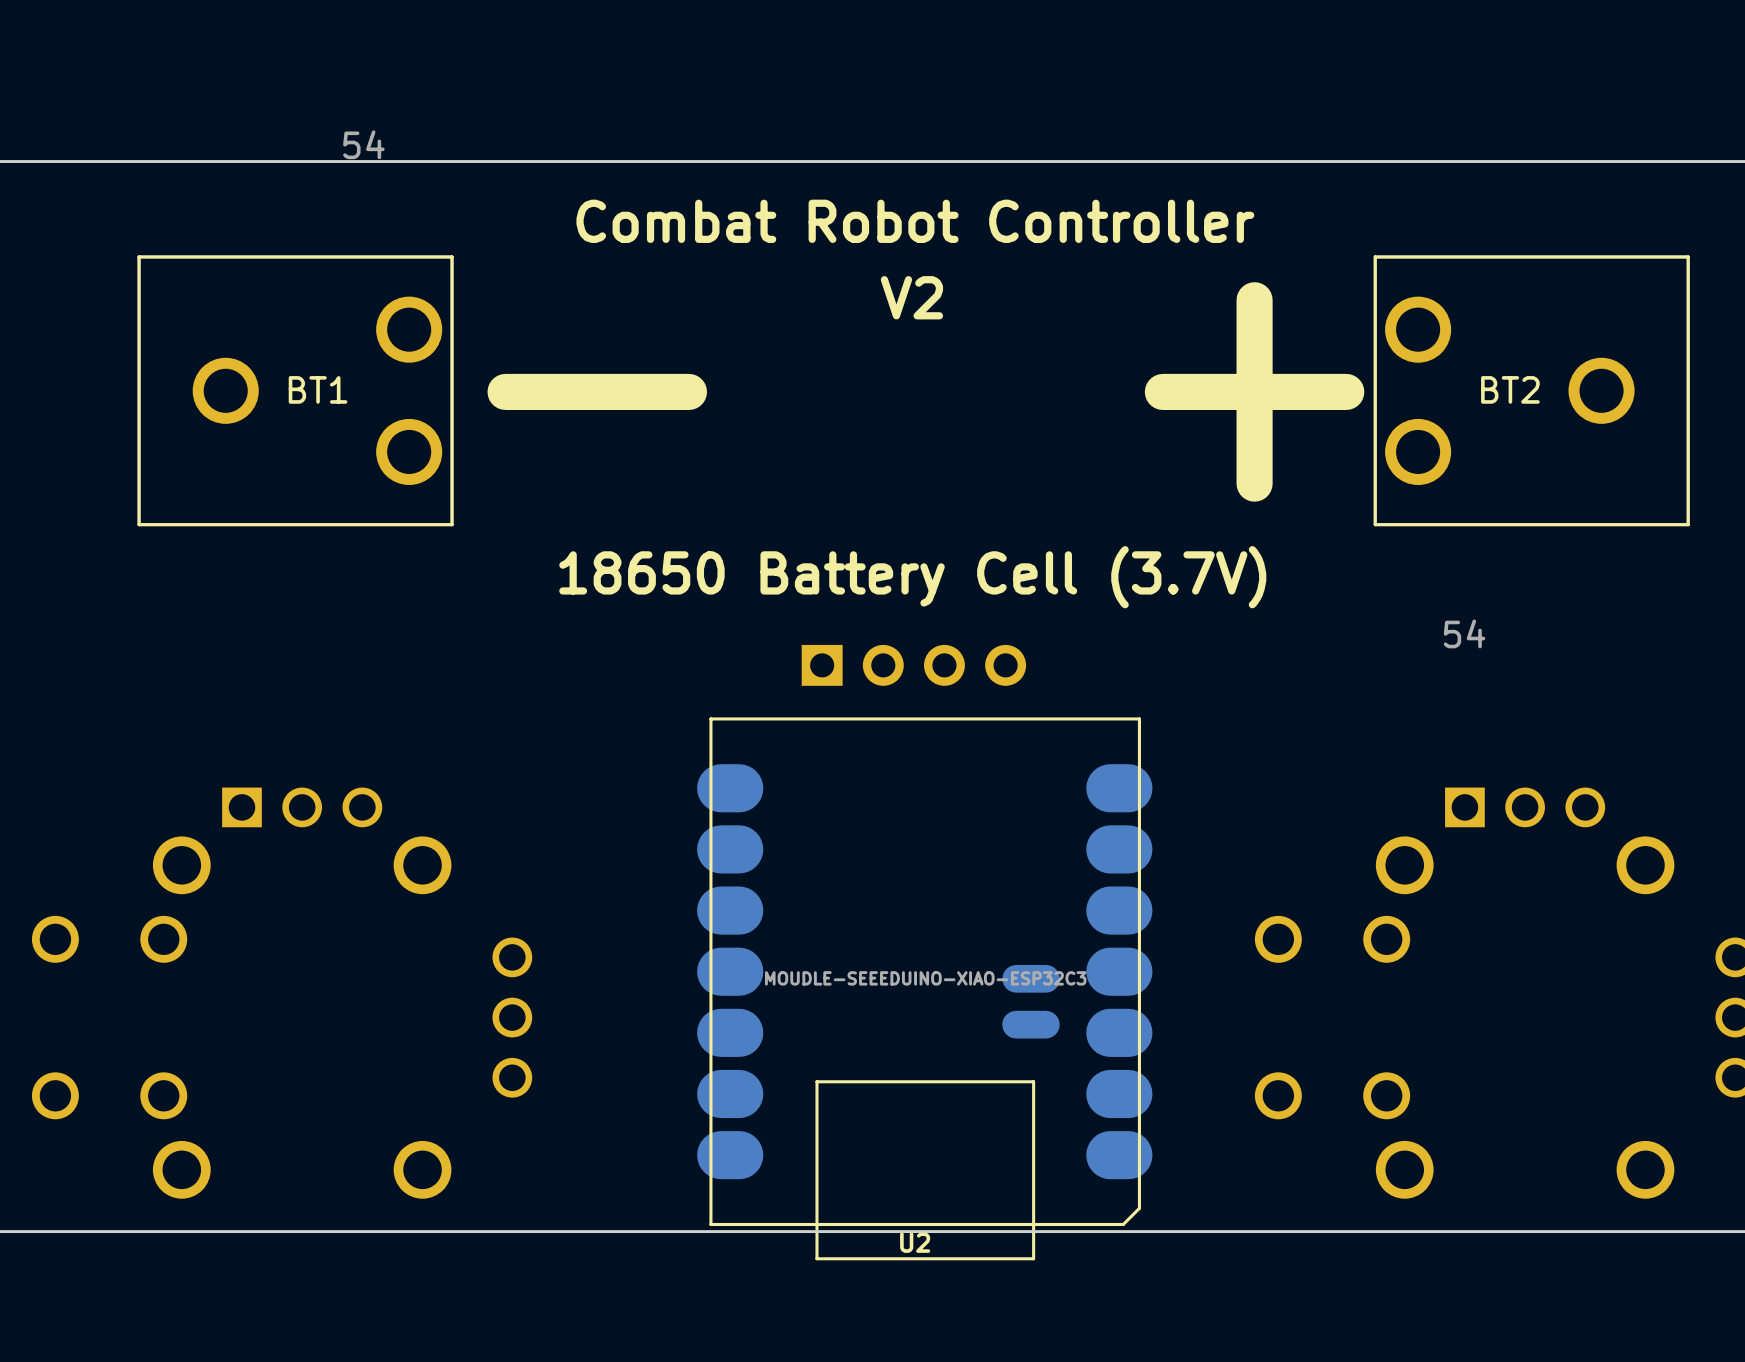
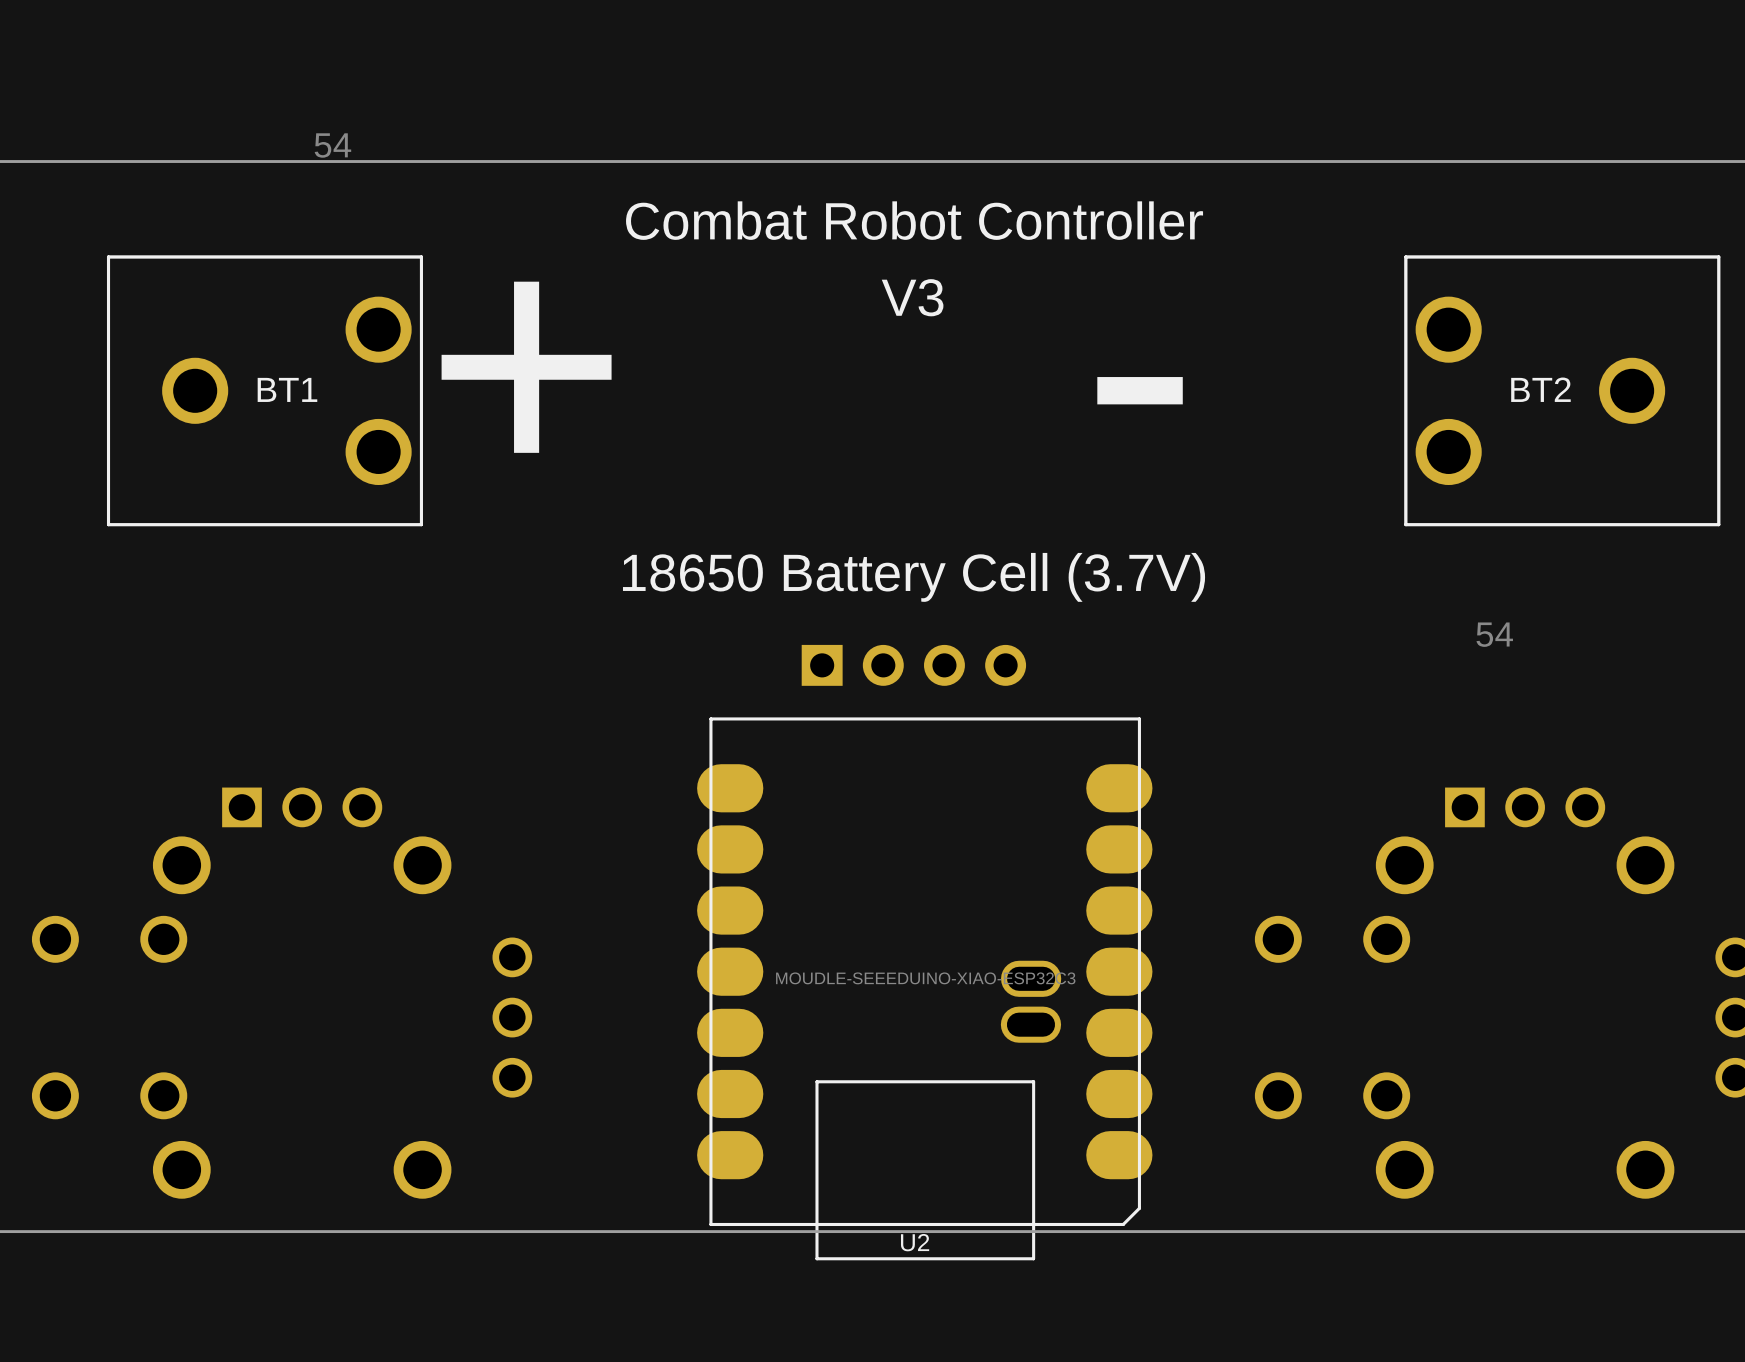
text: V2 (911, 297) -> V3 (912, 297)
BT1 position: (295, 390) -> (264, 390)
BT2 position: (1531, 390) -> (1562, 390)
text: - (597, 391) -> + (526, 367)
text: + (1254, 391) -> - (1140, 390)
U2 footprint: [697, 717, 1153, 1261] -> [697, 717, 1153, 1261]

